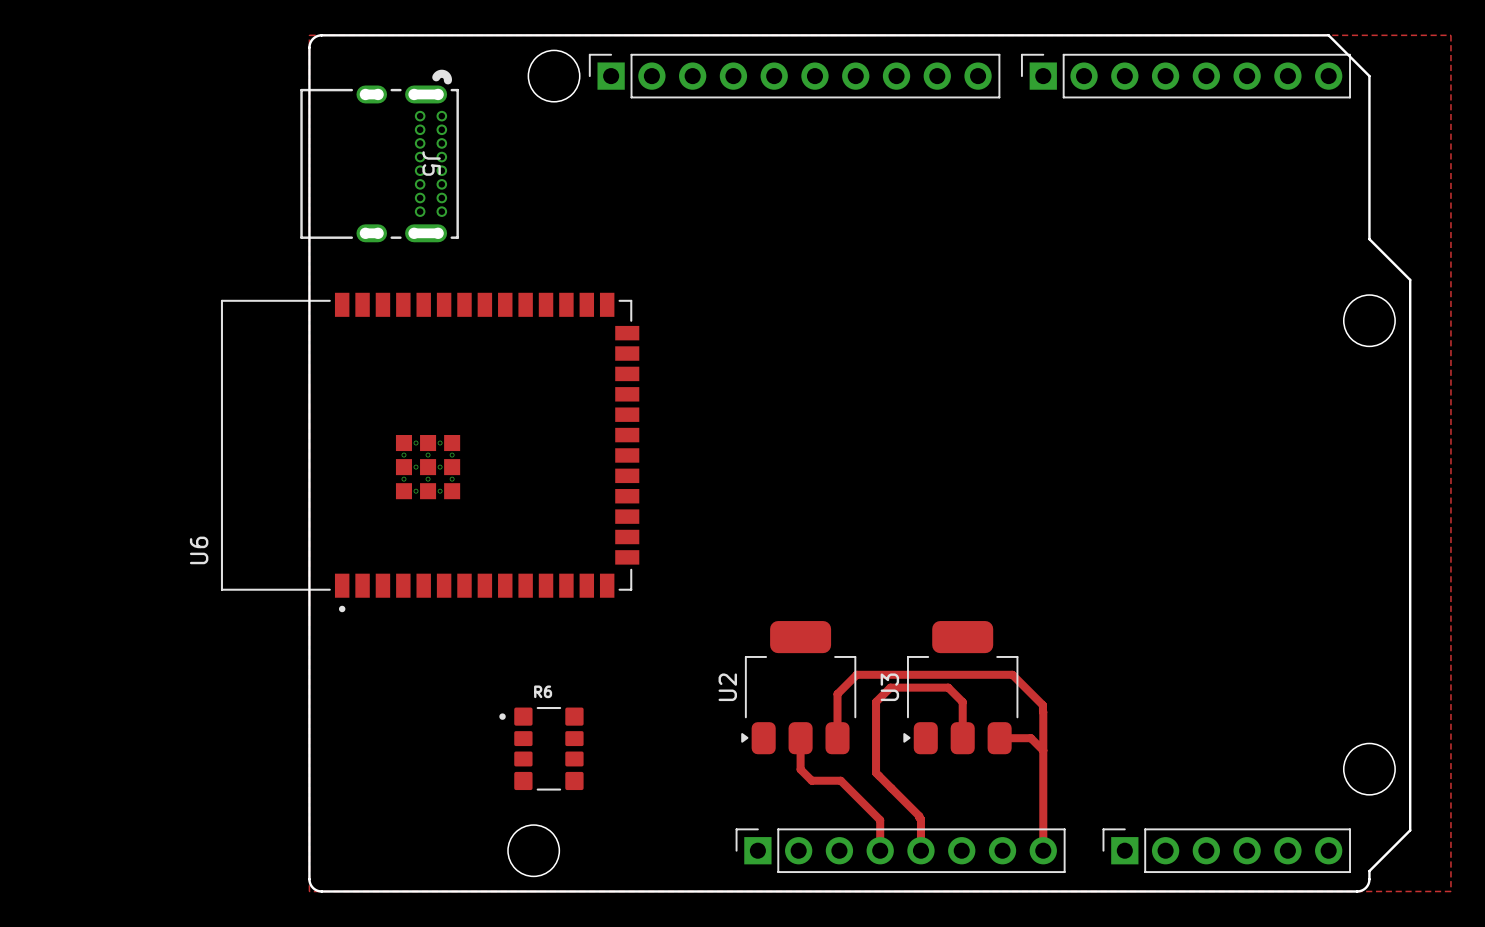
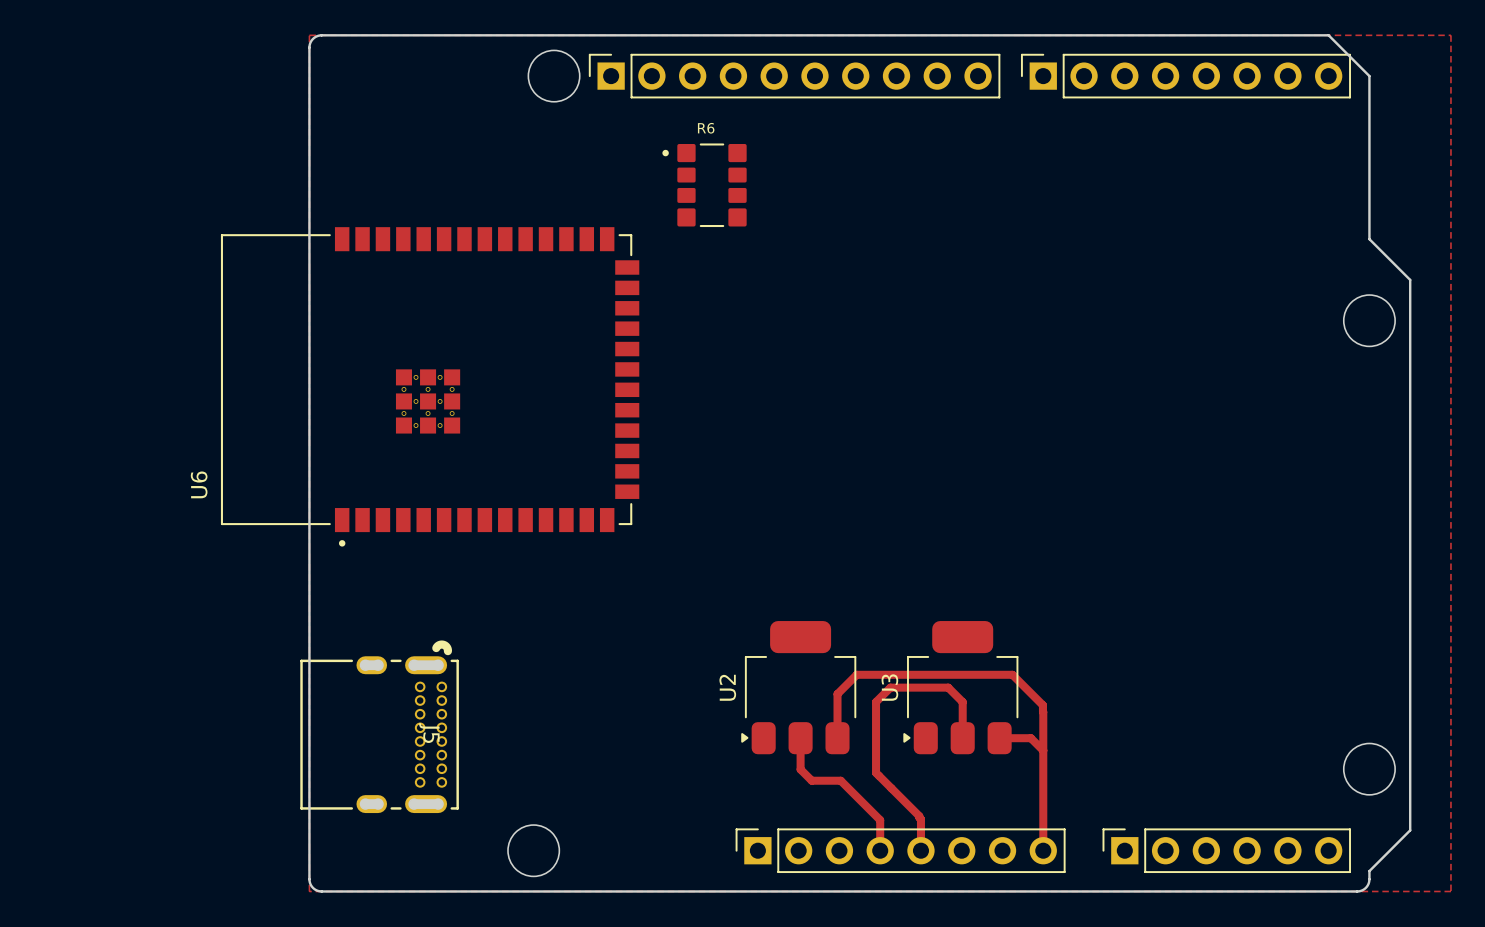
J5 position: (379, 155) -> (379, 726)
U6 position: (430, 452) -> (430, 386)
R6 position: (541, 748) -> (704, 185)

